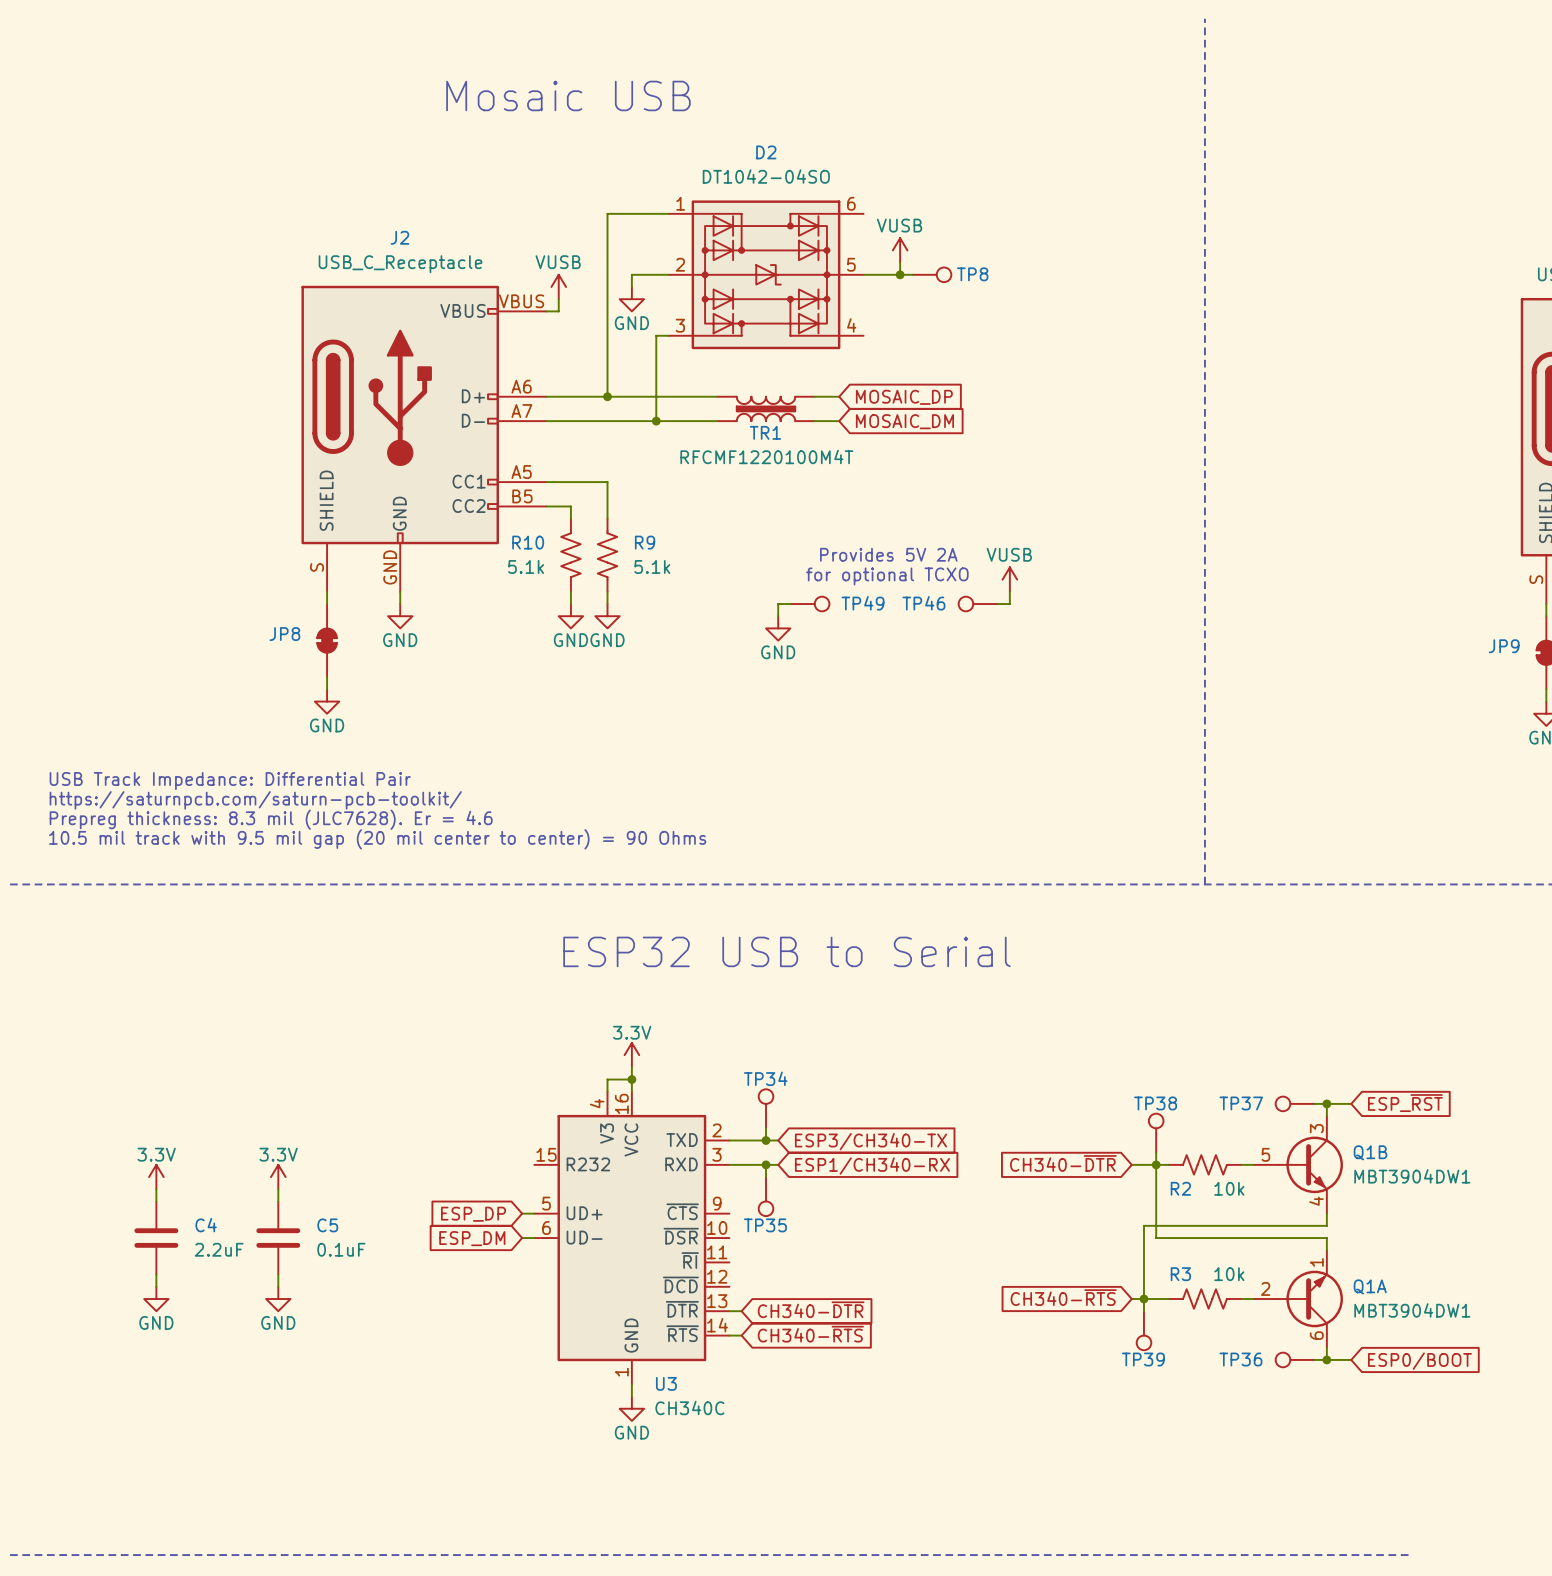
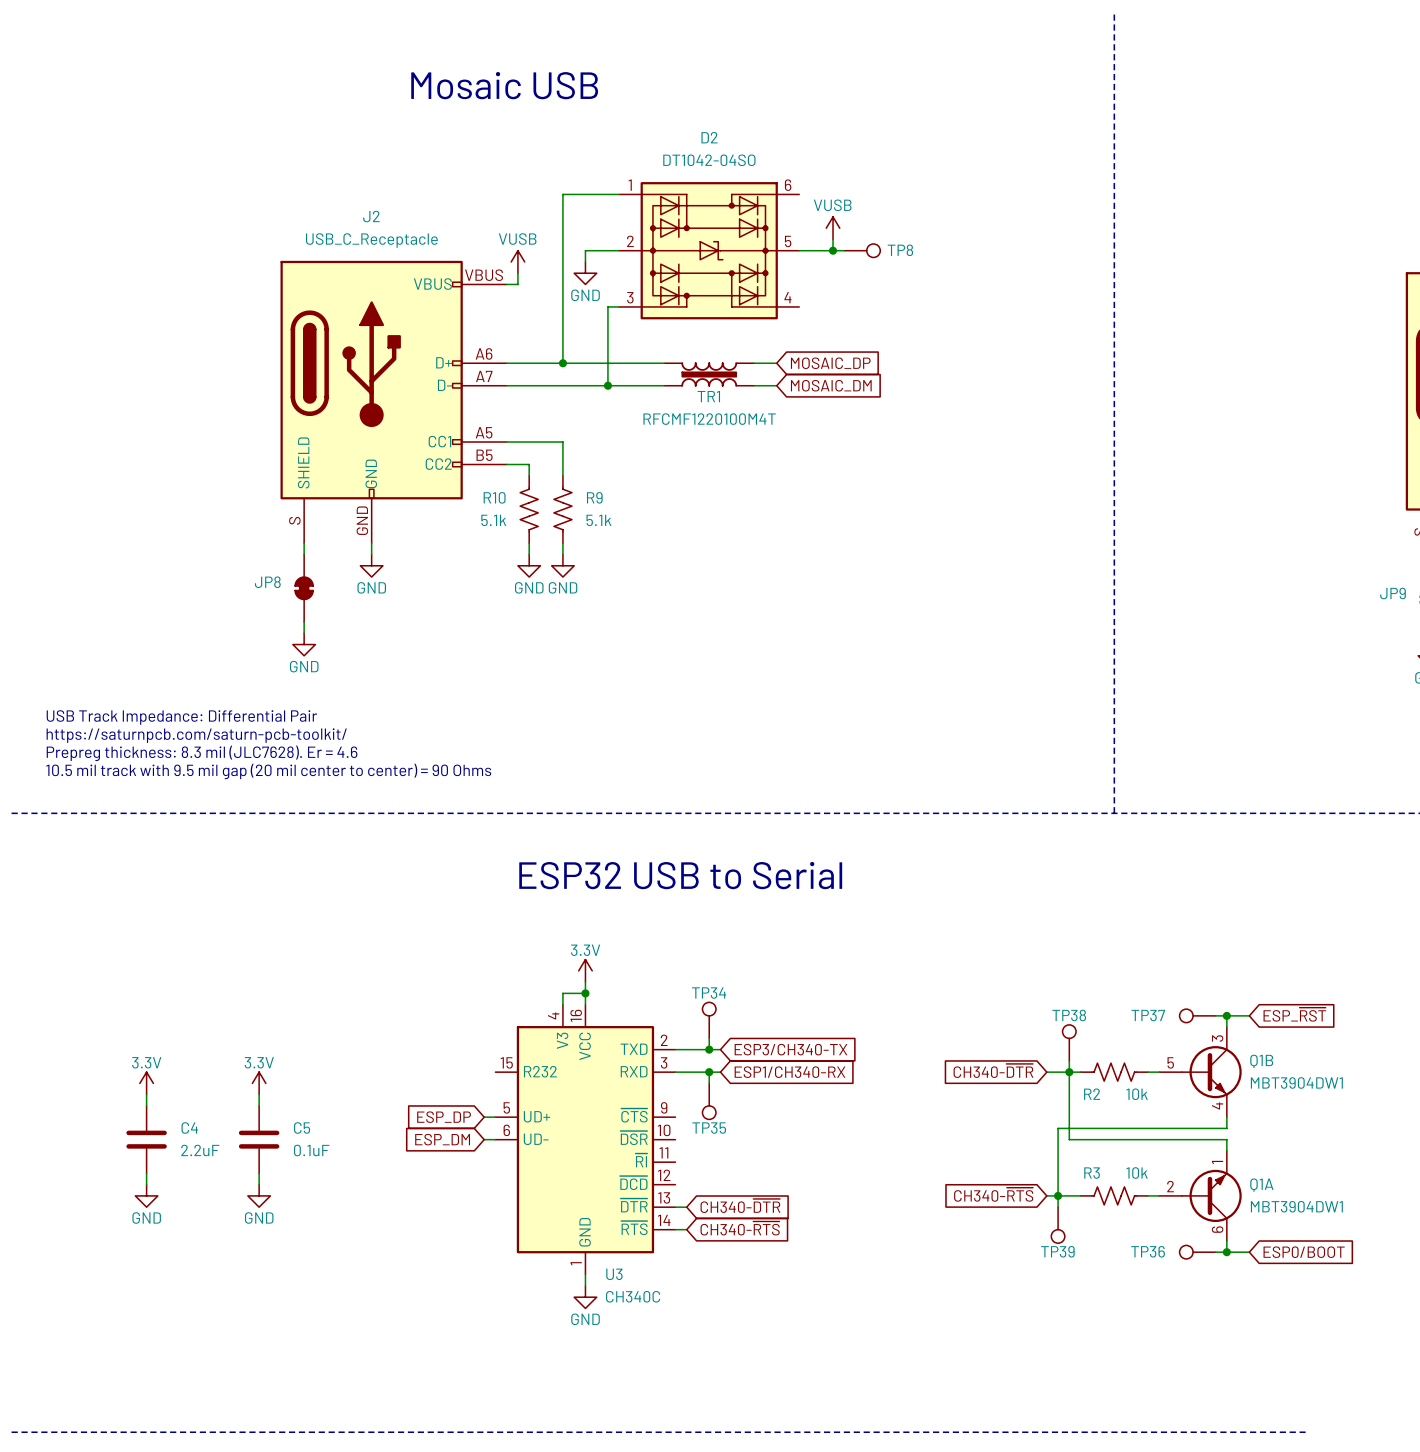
text: Provides 5V 2A (888, 554) -> none
text: for optional TCXO (887, 576) -> none
power symbol: VUSB (1009, 579) -> none
wire: (1009, 591) (1009, 604) (997, 604) -> none
wire: (790, 604) (778, 604) (778, 616) -> none
TP49: (809, 604) -> none
TP46: (978, 604) -> none
power symbol: GND (778, 628) -> none

